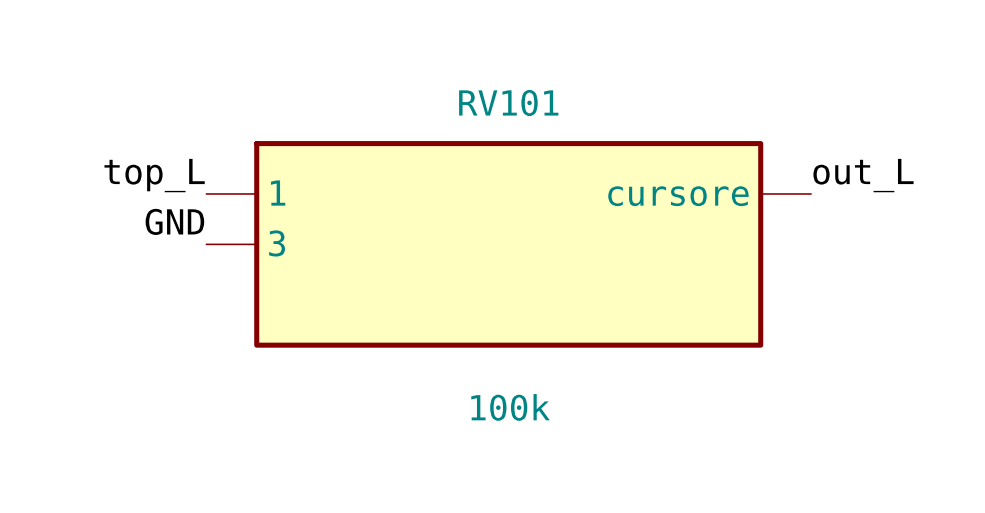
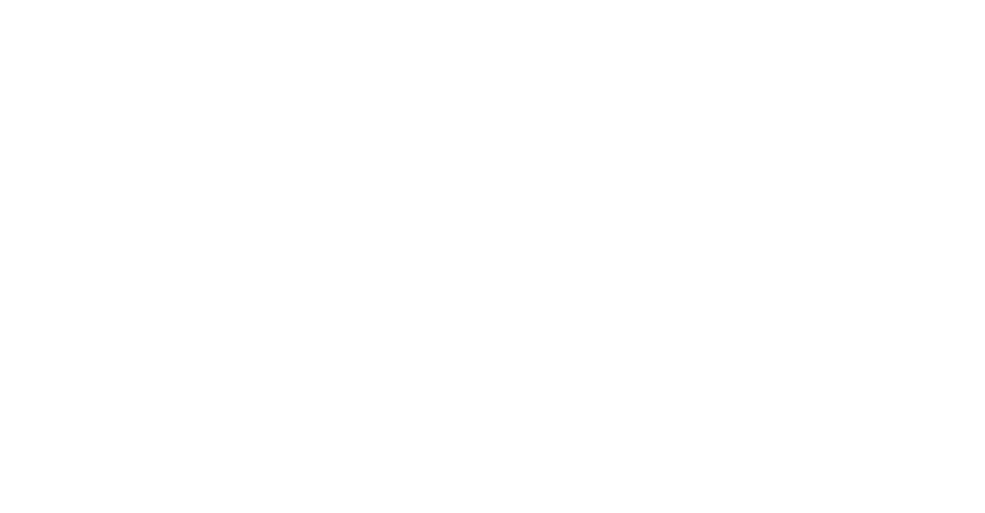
label: top_L (154, 175) -> none
label: out_L (863, 175) -> none
label: GND (174, 221) -> none
RV101: 100k (508, 244) -> none

